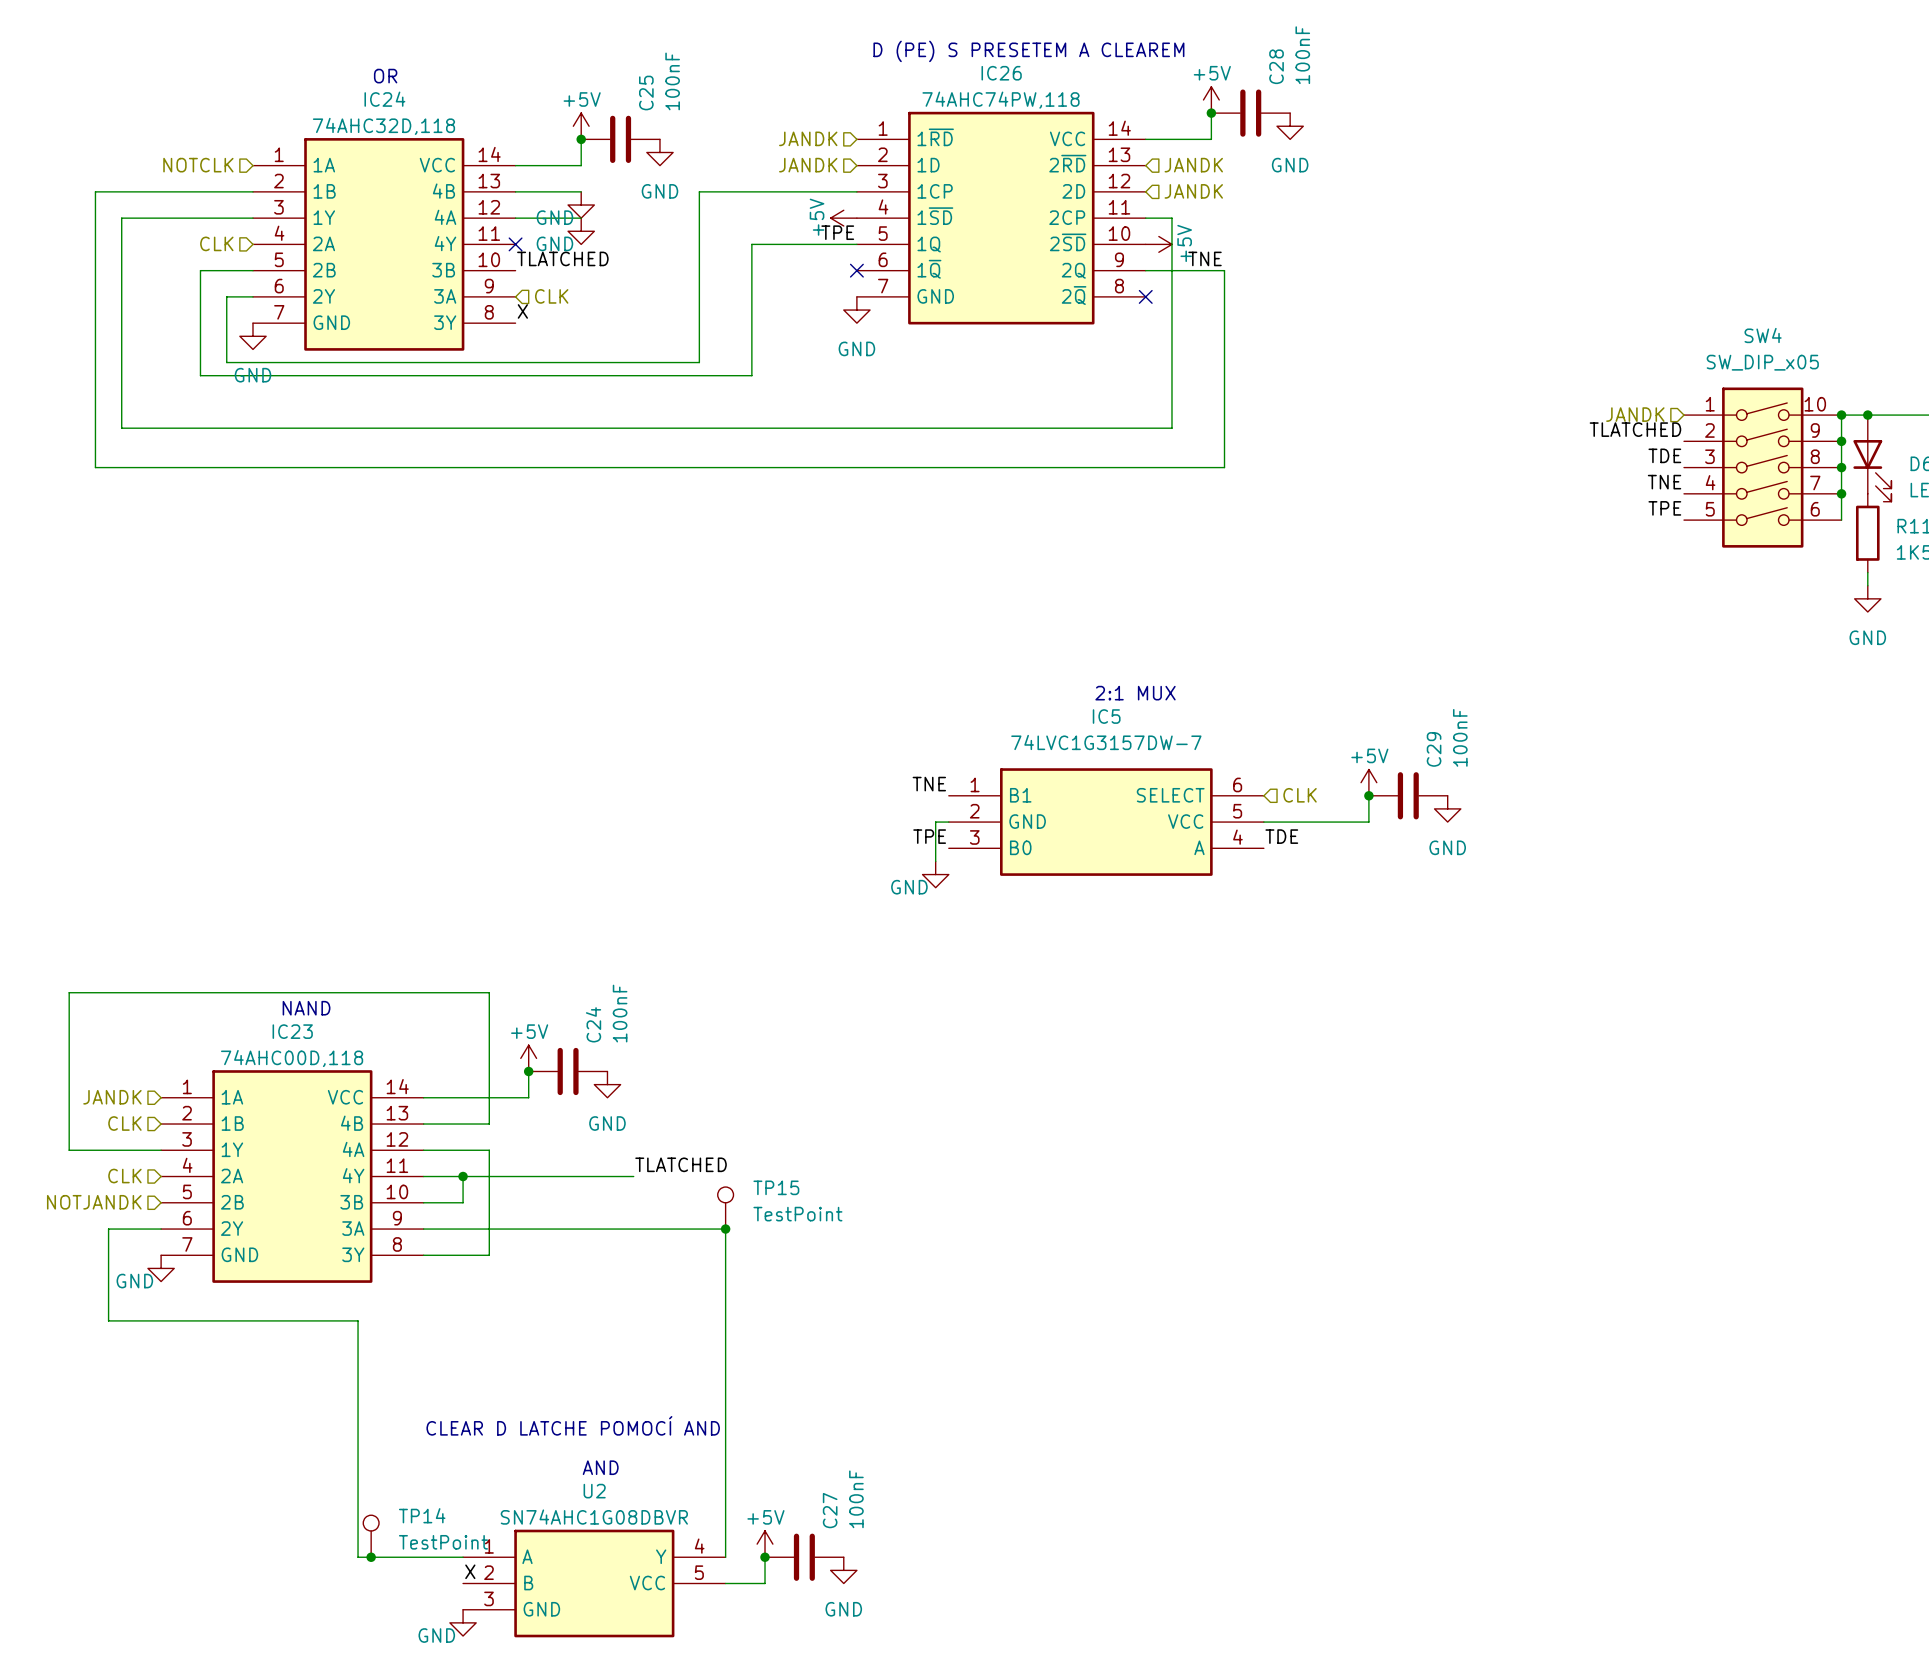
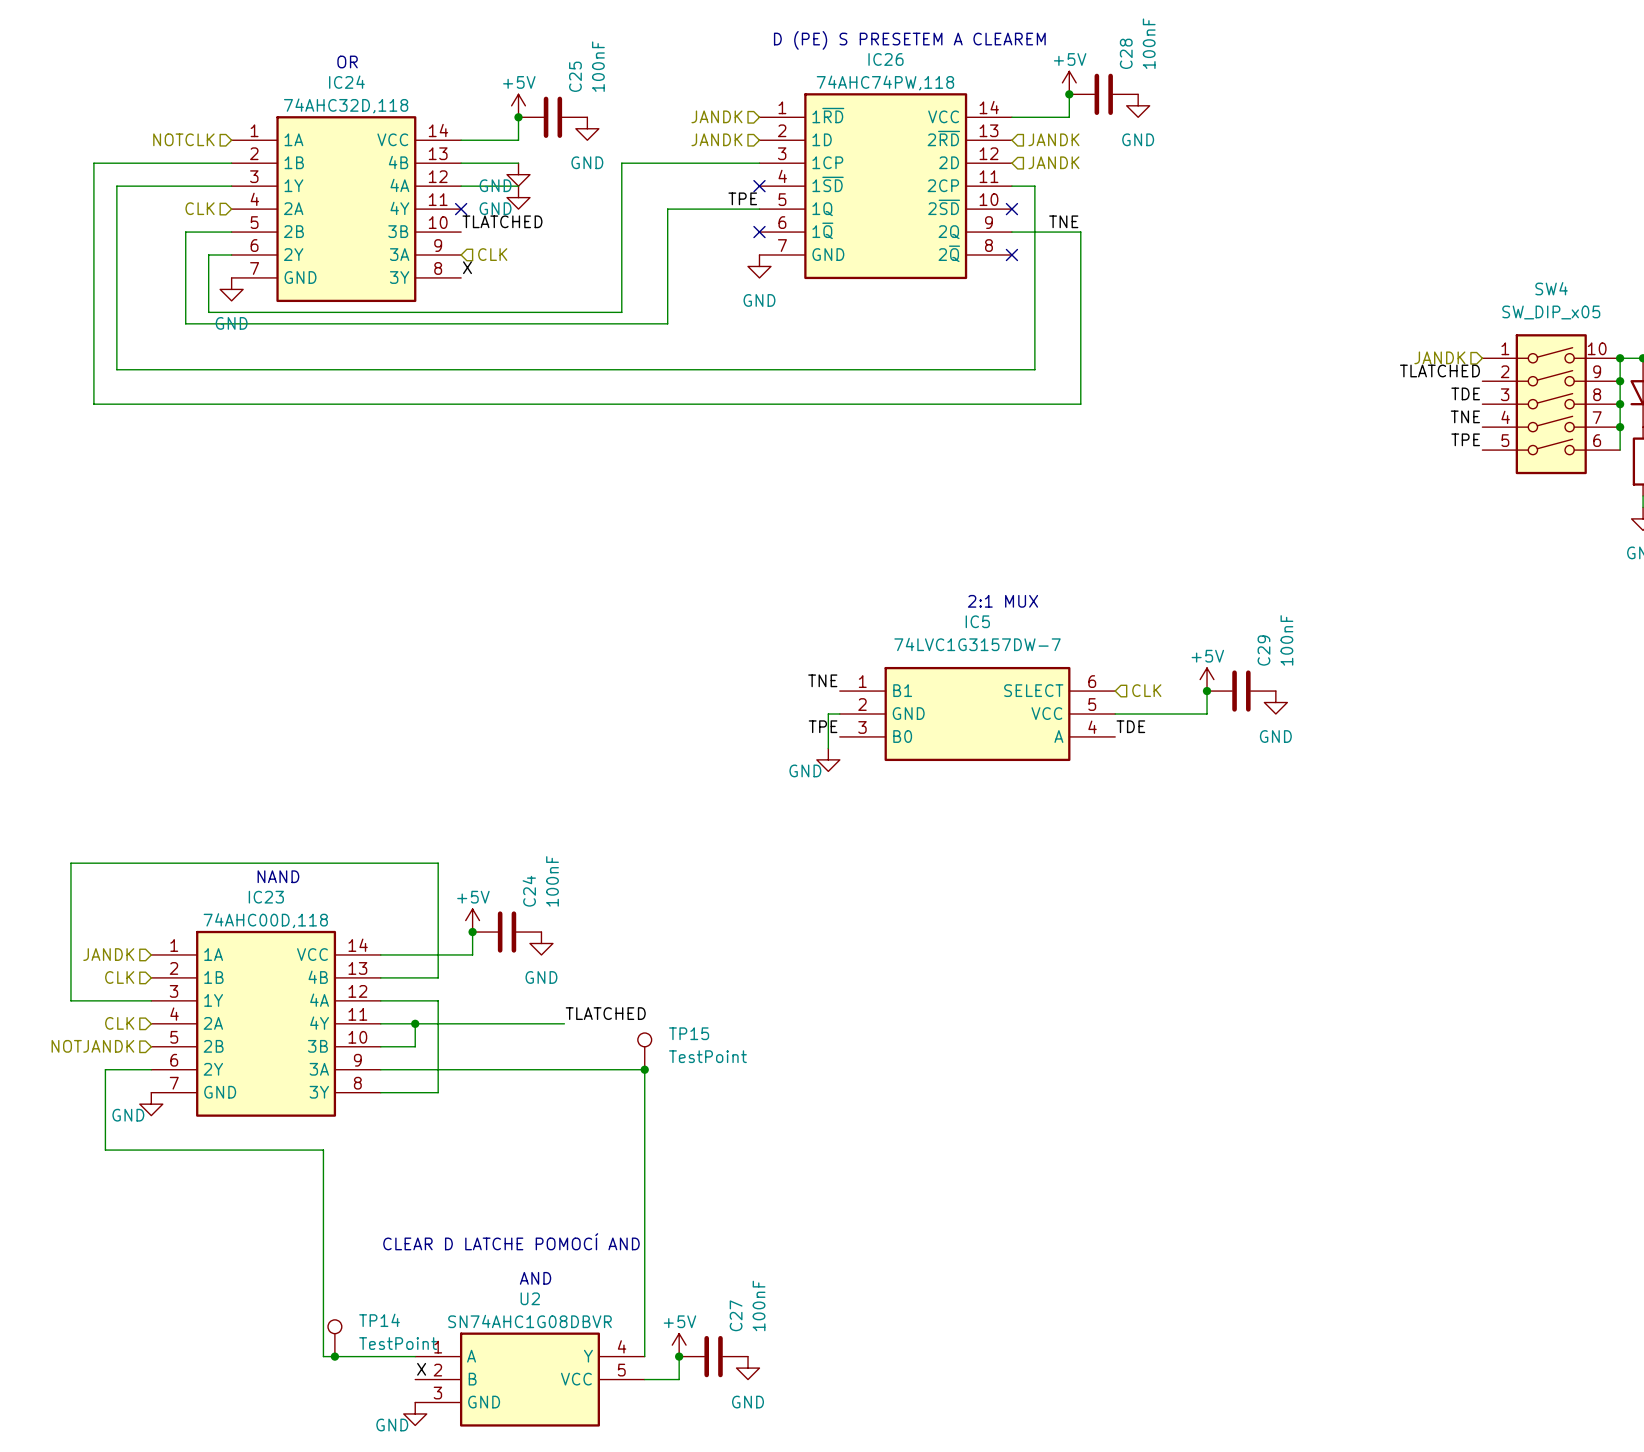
power symbol: +5V (843, 218) -> none
no-connect mark: none -> (759, 186)
no-connect mark: none -> (1011, 209)
power symbol: +5V (1158, 244) -> none

